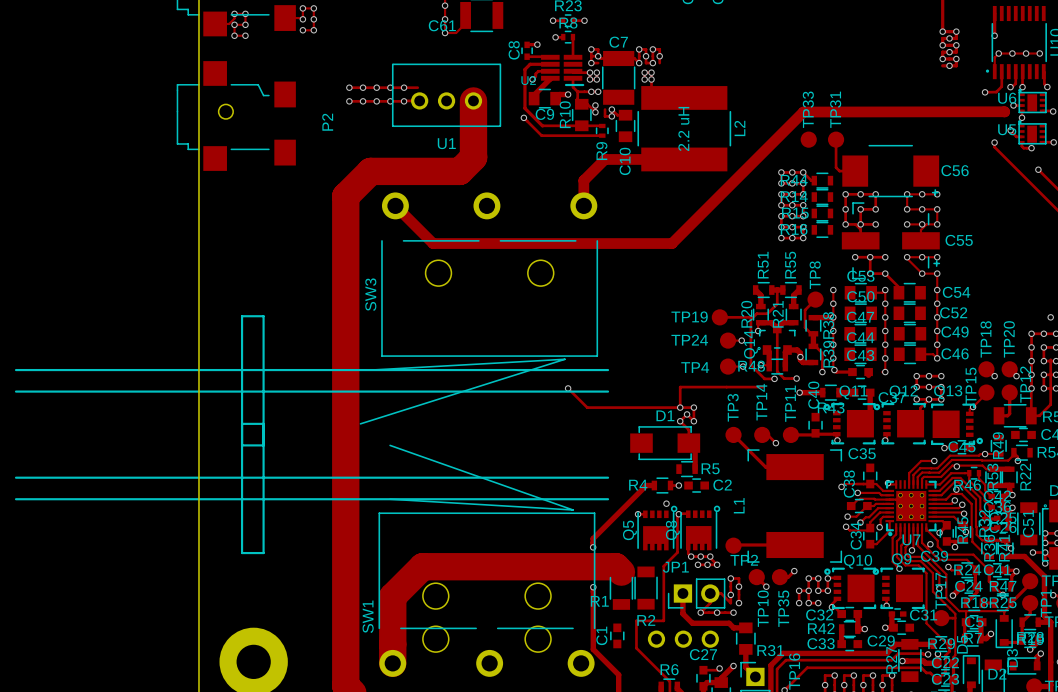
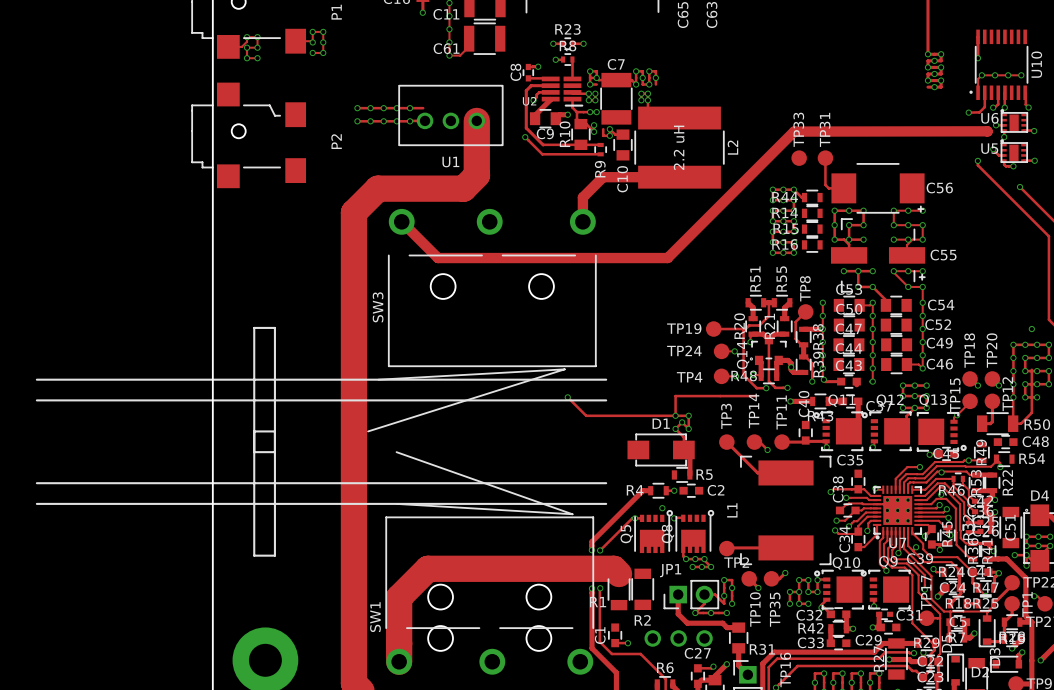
track: none -> (635, 518) (632, 518) (600, 550)
track: (677, 515) (677, 552) (663, 566) (663, 620) (636, 620) (636, 648) (669, 681) -> (600, 588) (599, 641) (611, 654) (640, 654) (665, 679)
via: none -> (600, 550)
via: none -> (600, 588)
track: none -> (615, 643) (627, 643)
via: none -> (627, 643)

